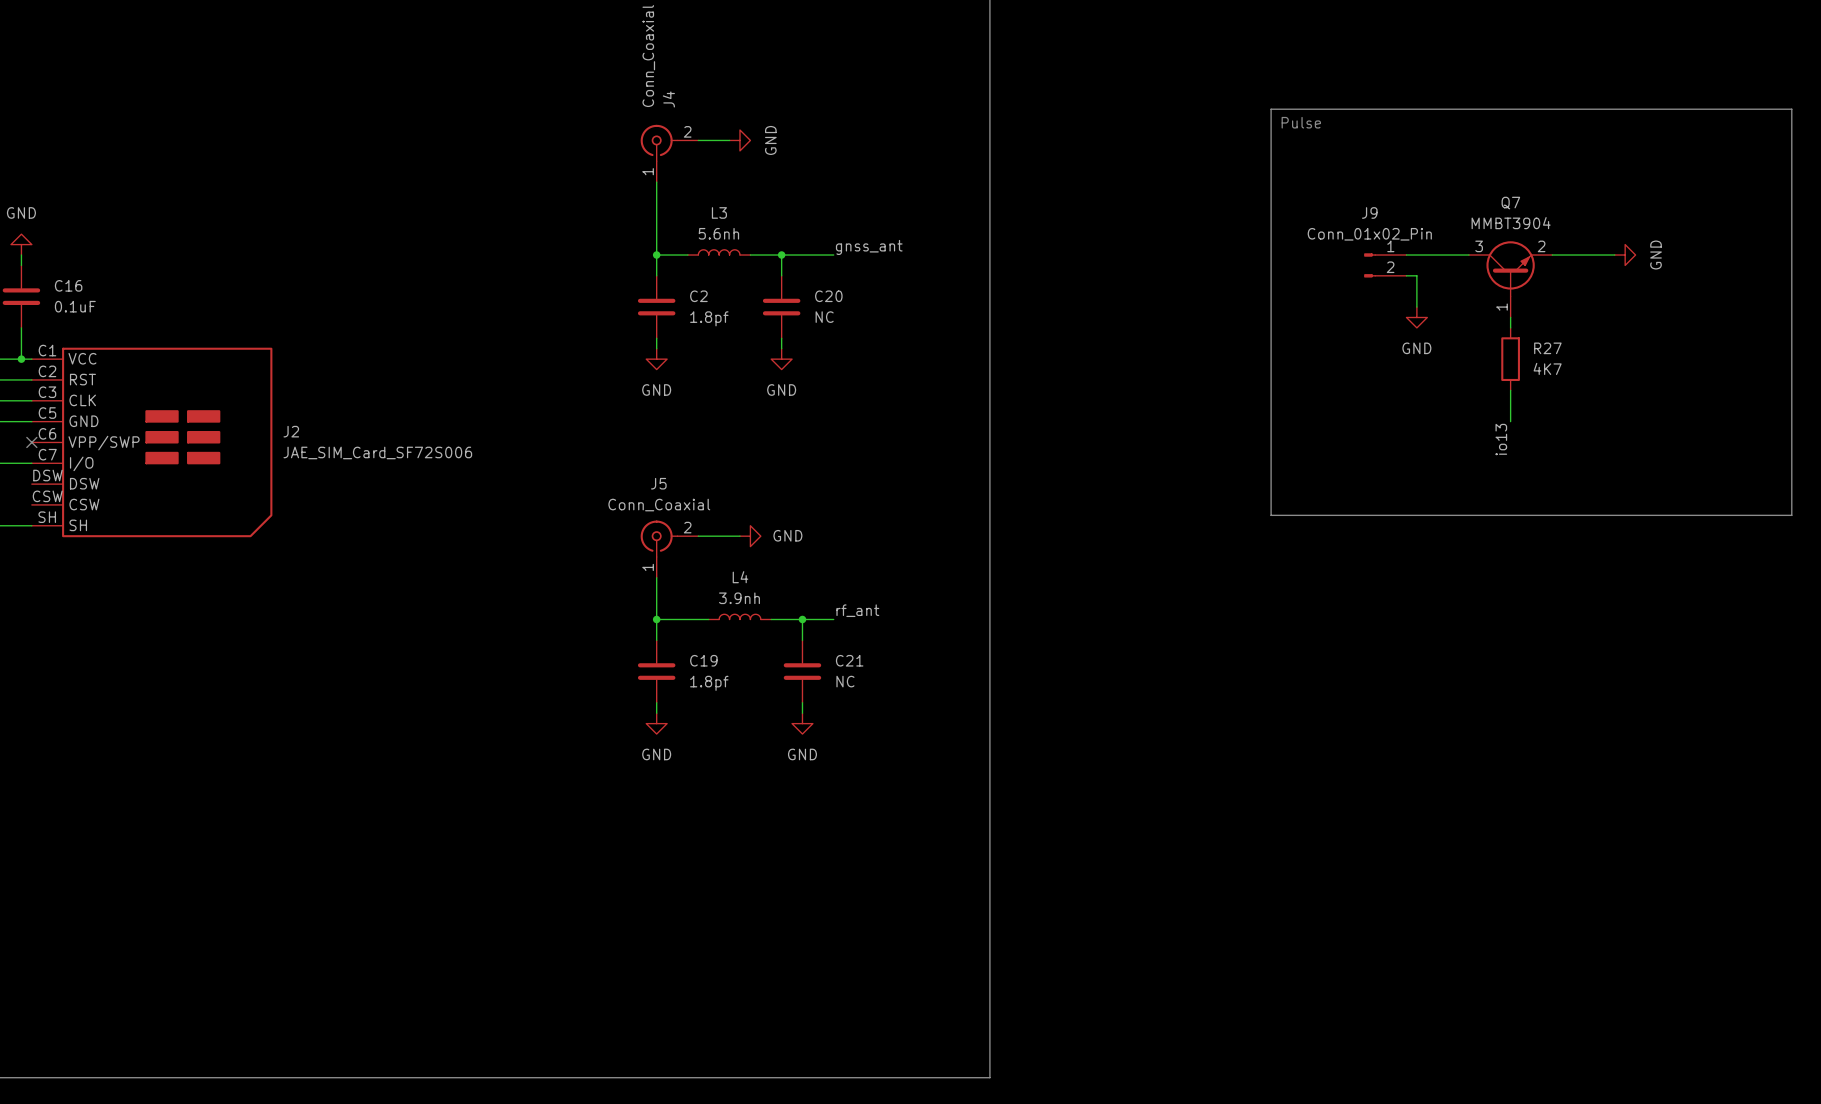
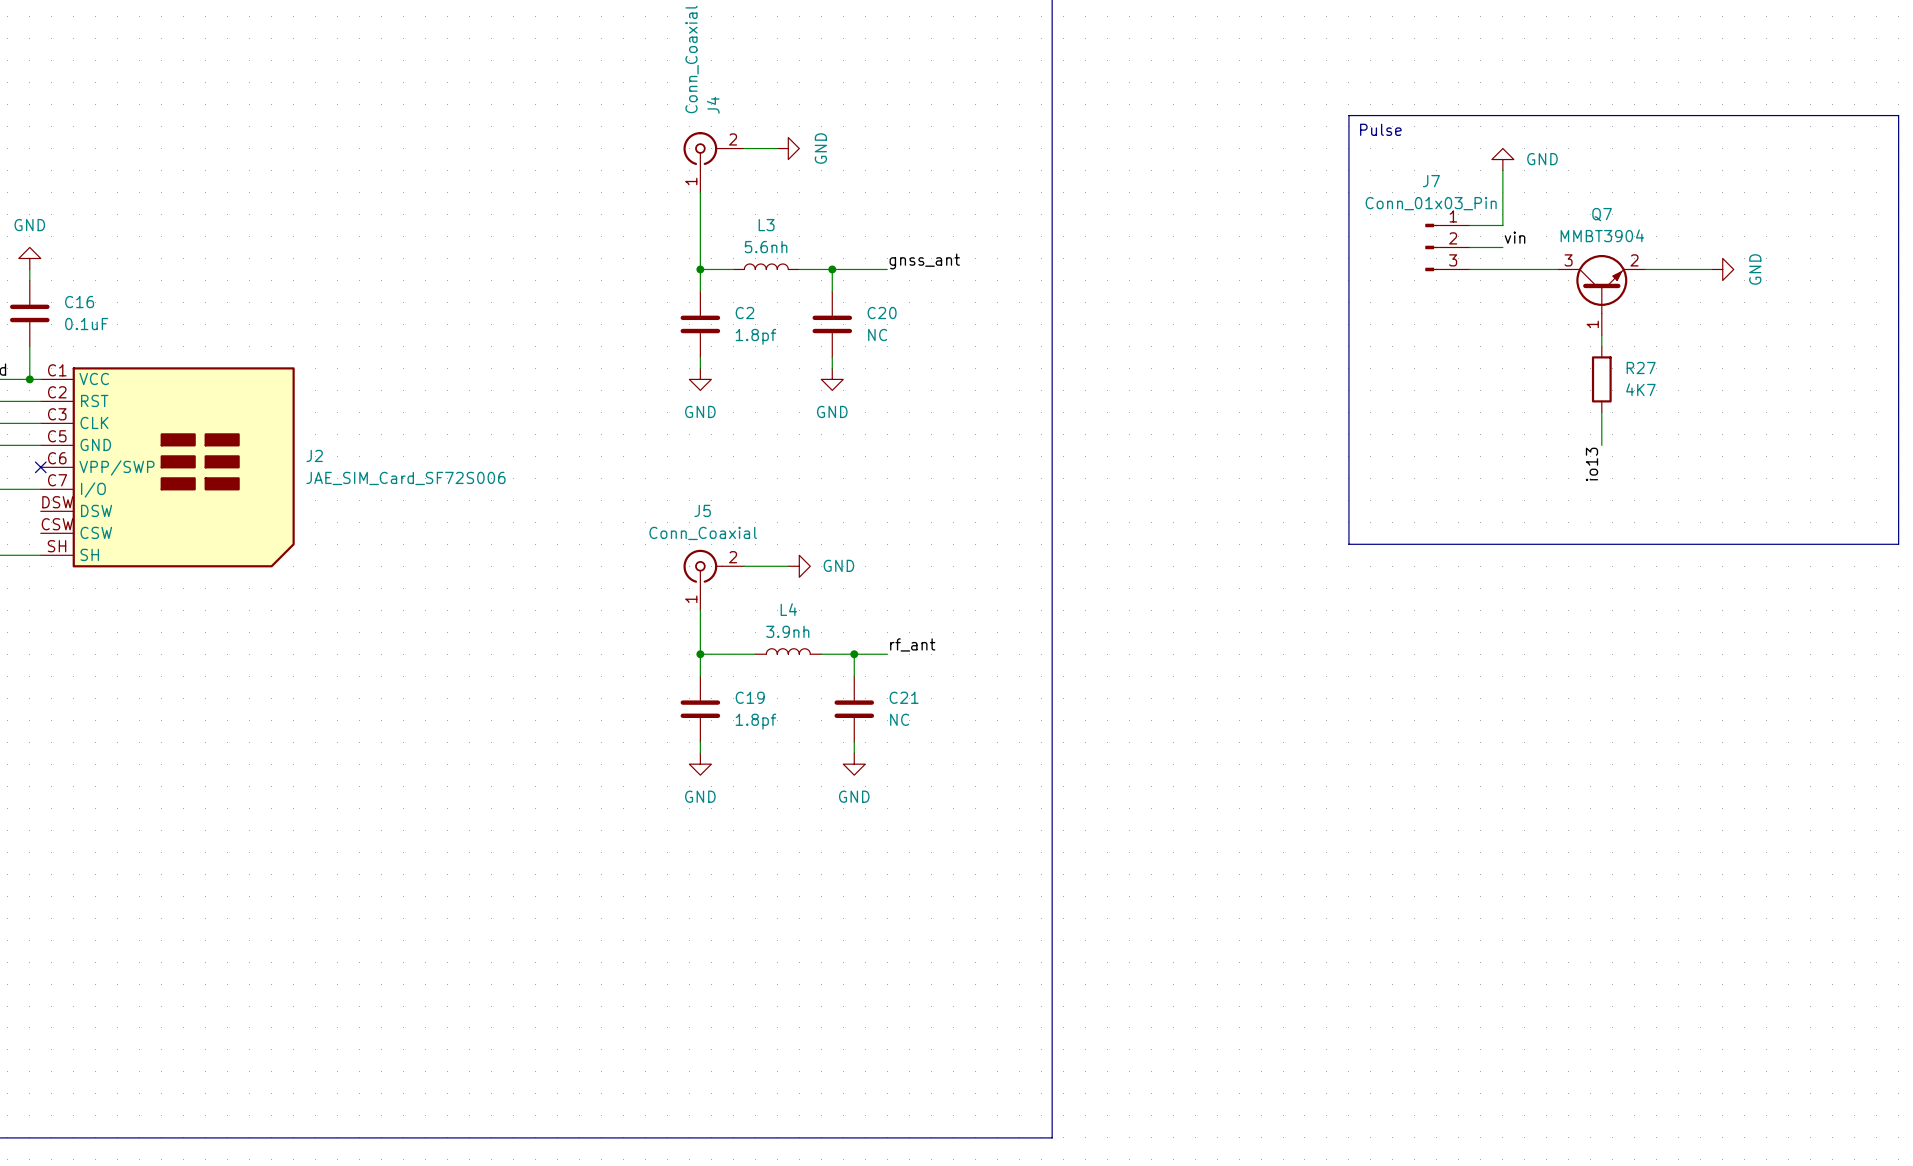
wire: none -> (1502, 170) (1502, 225) (1469, 225)
label: none -> vin (1514, 237)
J7: none -> Conn_01x03_Pin (1447, 247)
wire: none -> (1469, 247) (1502, 247)
J9: Conn_01x02_Pin (1385, 265) -> none
wire: (1406, 275) (1416, 275) (1416, 307) -> none
power symbol rotation: 0° (1416, 317) -> 180° (1502, 159)
power symbol position: GND (1416, 317) -> GND (1502, 159)
power symbol text position: GND (1416, 348) -> GND (1542, 159)

